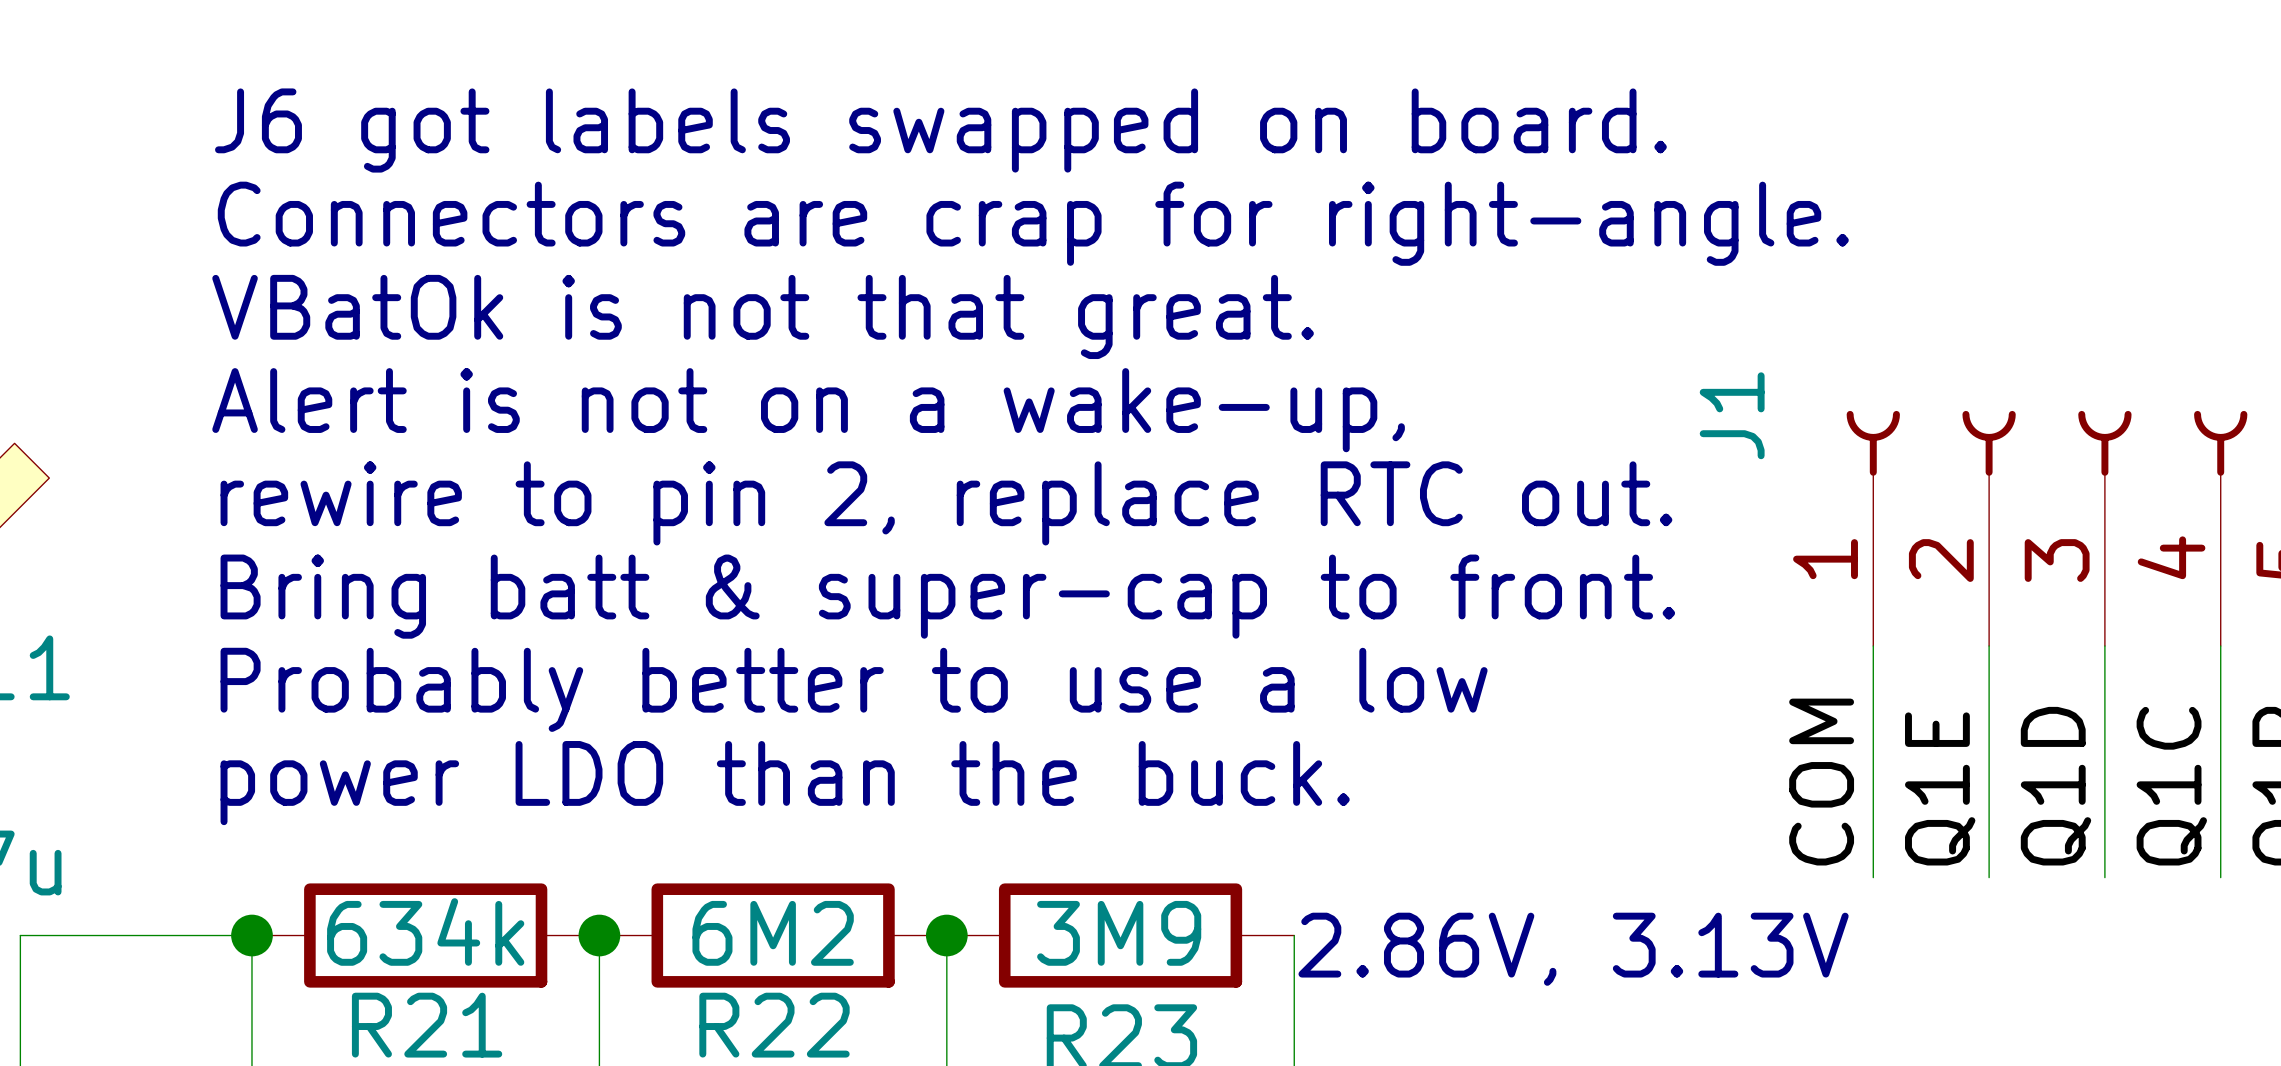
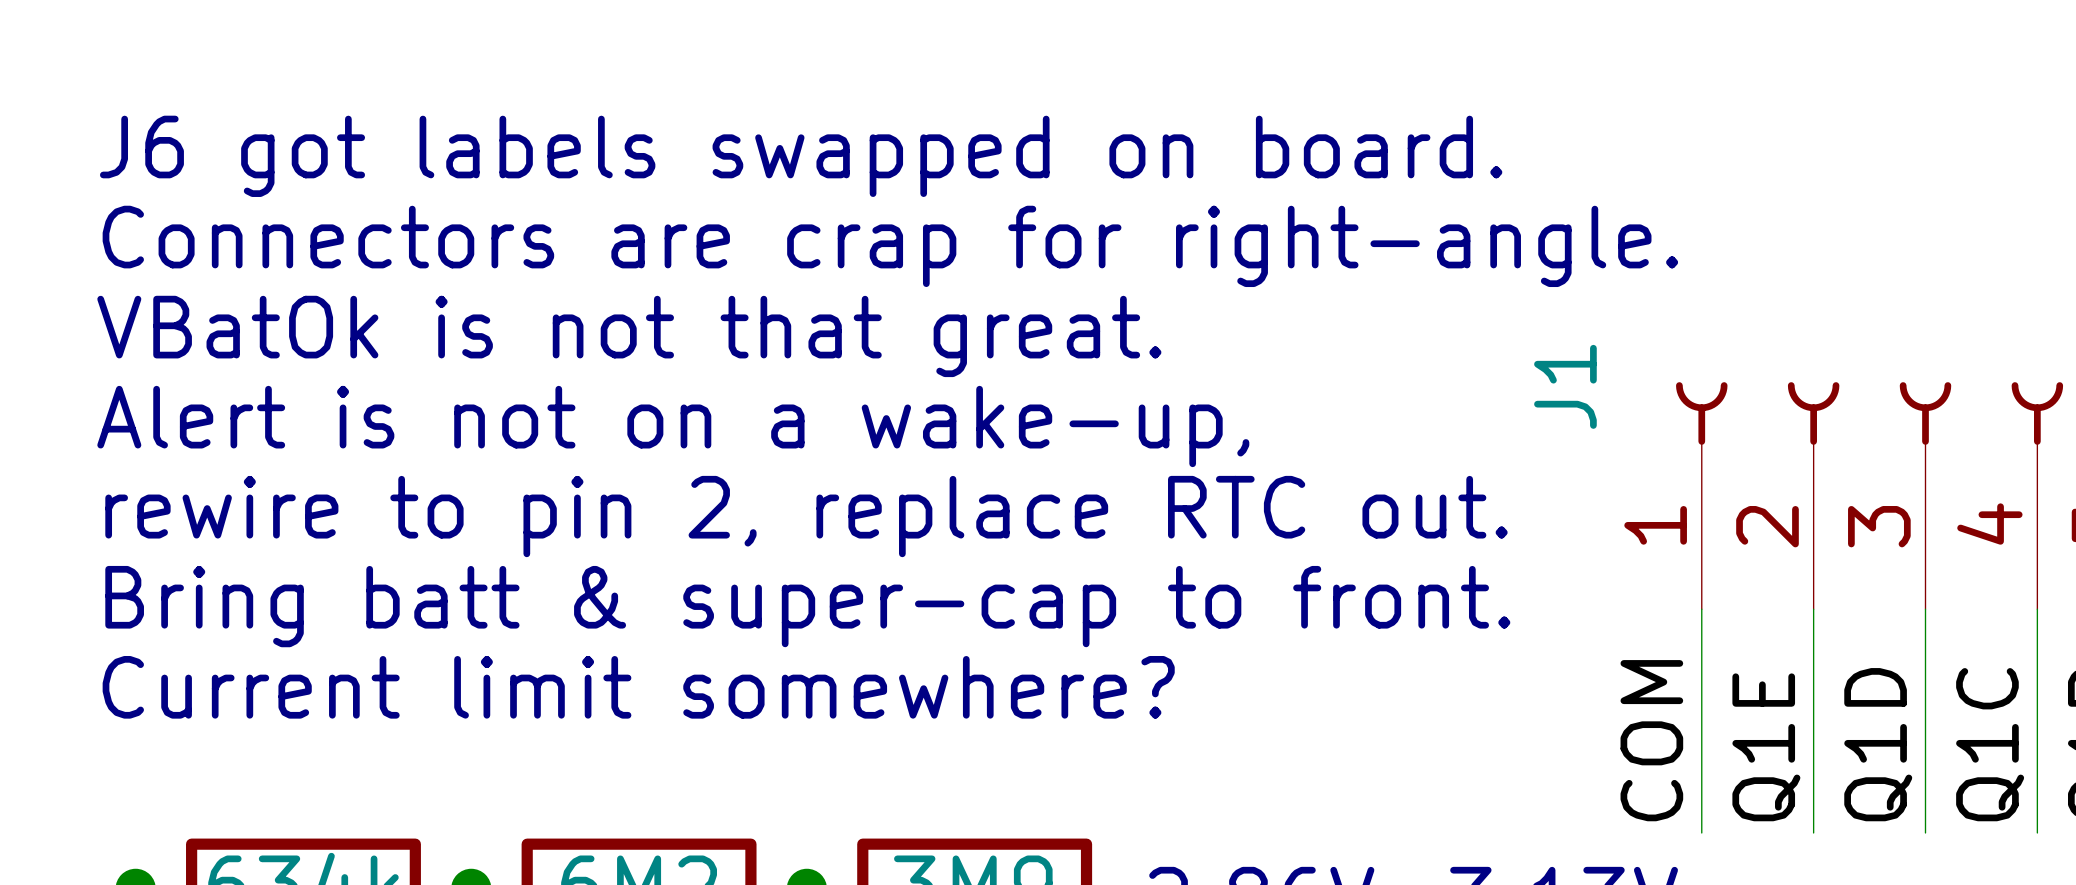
text position: J6 got labels swapped on board. (940, 130) -> J6 got labels swapped on board. (801, 156)
text position: Connectors are crap for right-angle. (1033, 223) -> Connectors are crap for right-angle. (890, 246)
text position: VBatOk is not that great. (763, 316) -> VBatOk is not that great. (629, 336)
text position: Alert is not on a wake-up, (808, 410) -> Alert is not on a wake-up, (673, 426)
text position: rewire to pin 2, replace RTC out. (946, 503) -> rewire to pin 2, replace RTC out. (806, 516)
text position: Bring batt & super-cap to front. (947, 596) -> Bring batt & super-cap to front. (807, 606)
text: Probably better to use a low (854, 689) -> none
text: none -> Current limit somewhere? (638, 687)
text: power LDO than the buck. (785, 783) -> none

